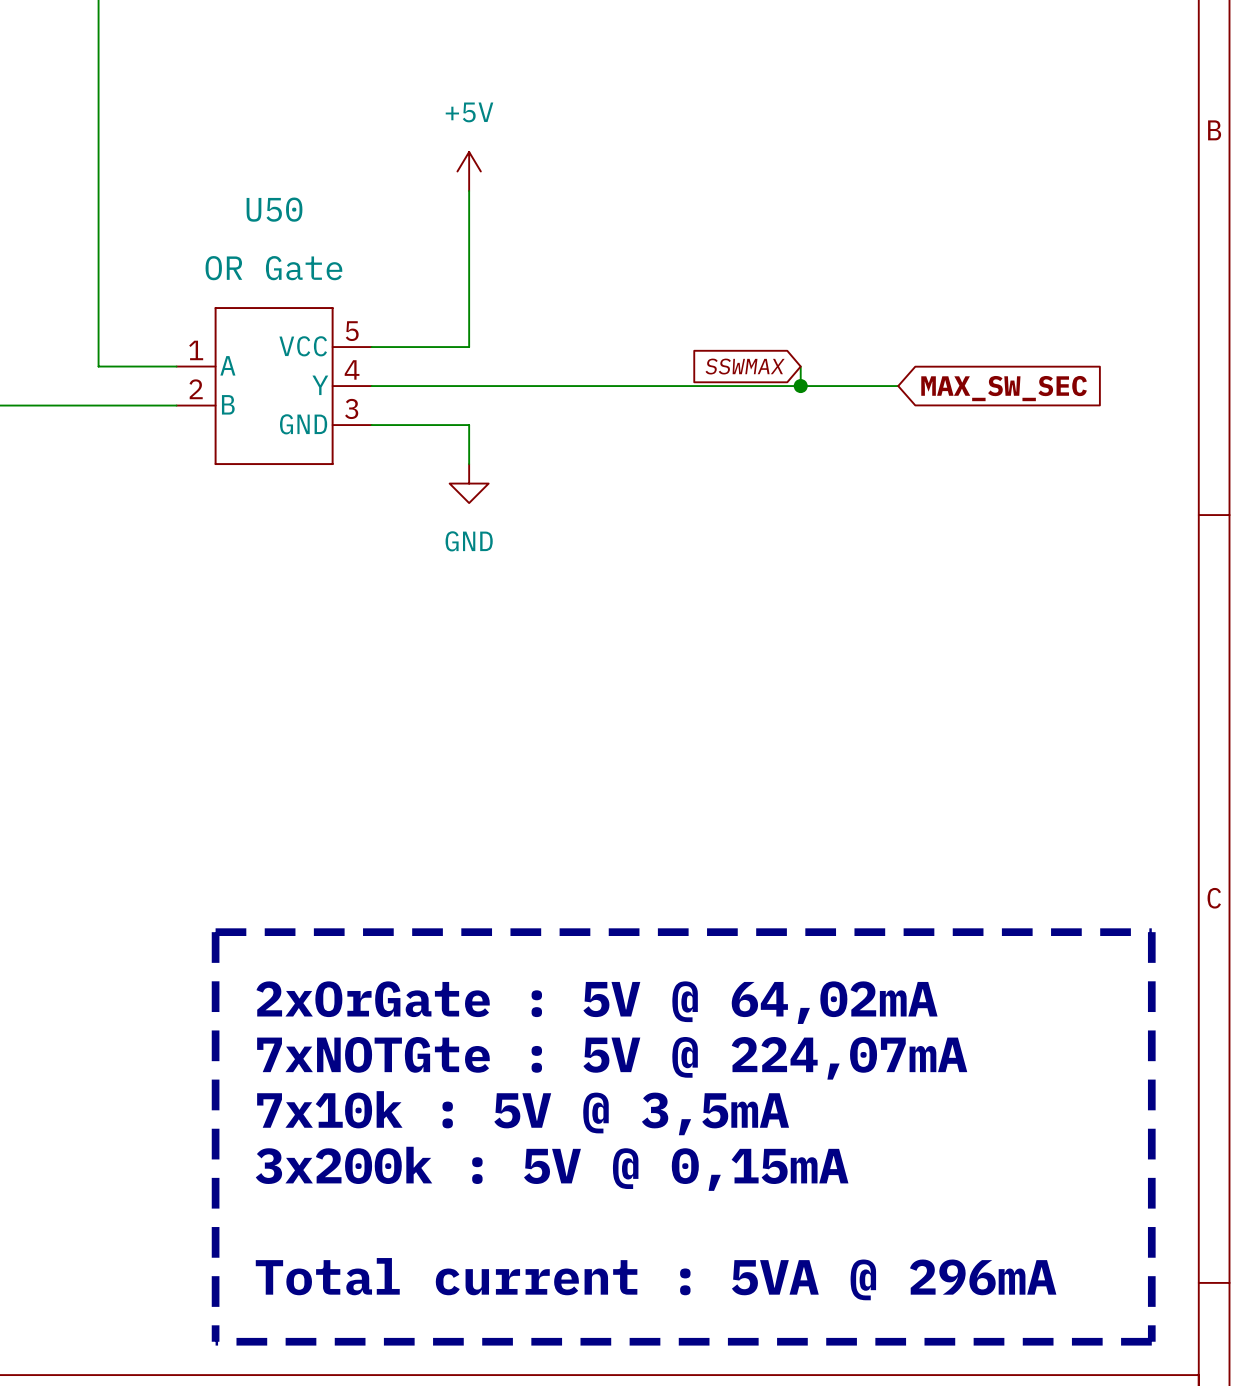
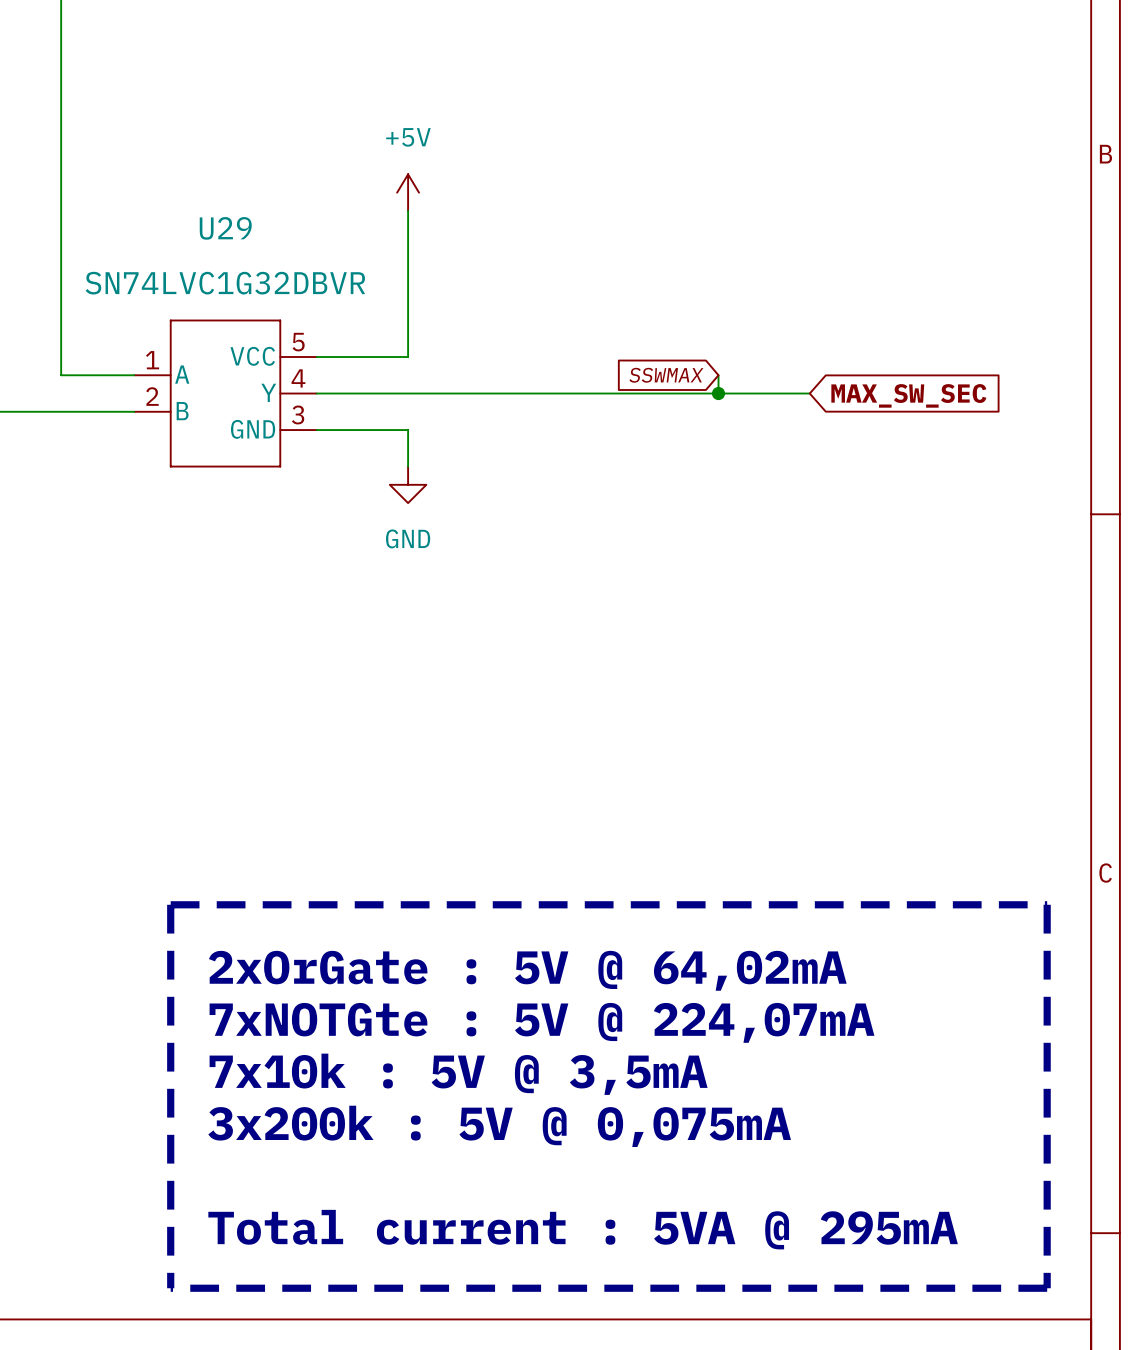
U50 name: U50 (274, 209) -> U29 (225, 228)
U50 value: OR Gate (273, 268) -> SN74LVC1G32DBVR (225, 283)
text: 3x200k : 5V @ 0,15mA (552, 1168) -> 3x200k : 5V @ 0,075mA (499, 1126)
text: Total current : 5VA @ 296mA (656, 1279) -> Total current : 5VA @ 295mA (583, 1229)

